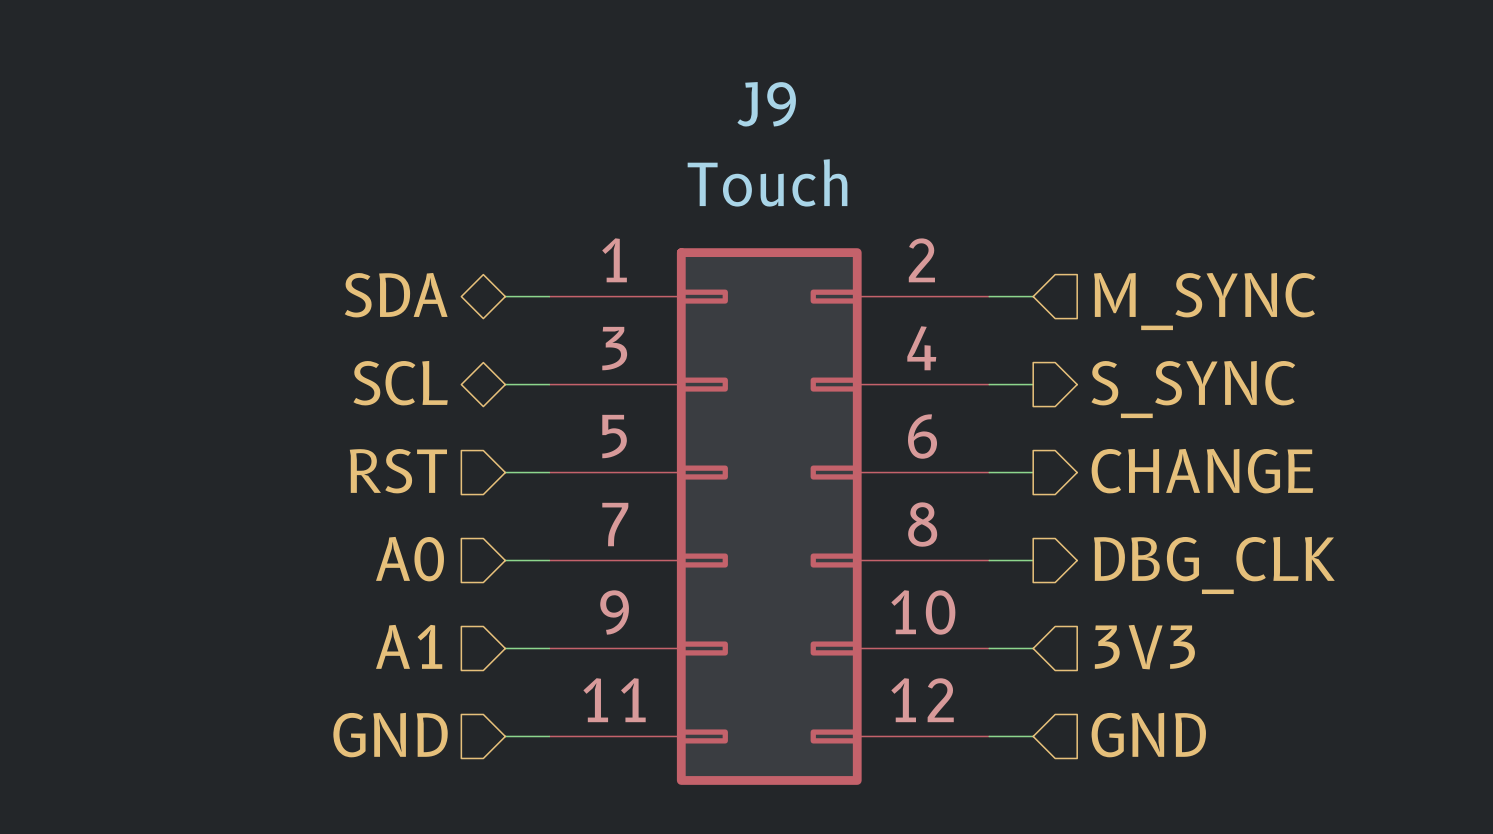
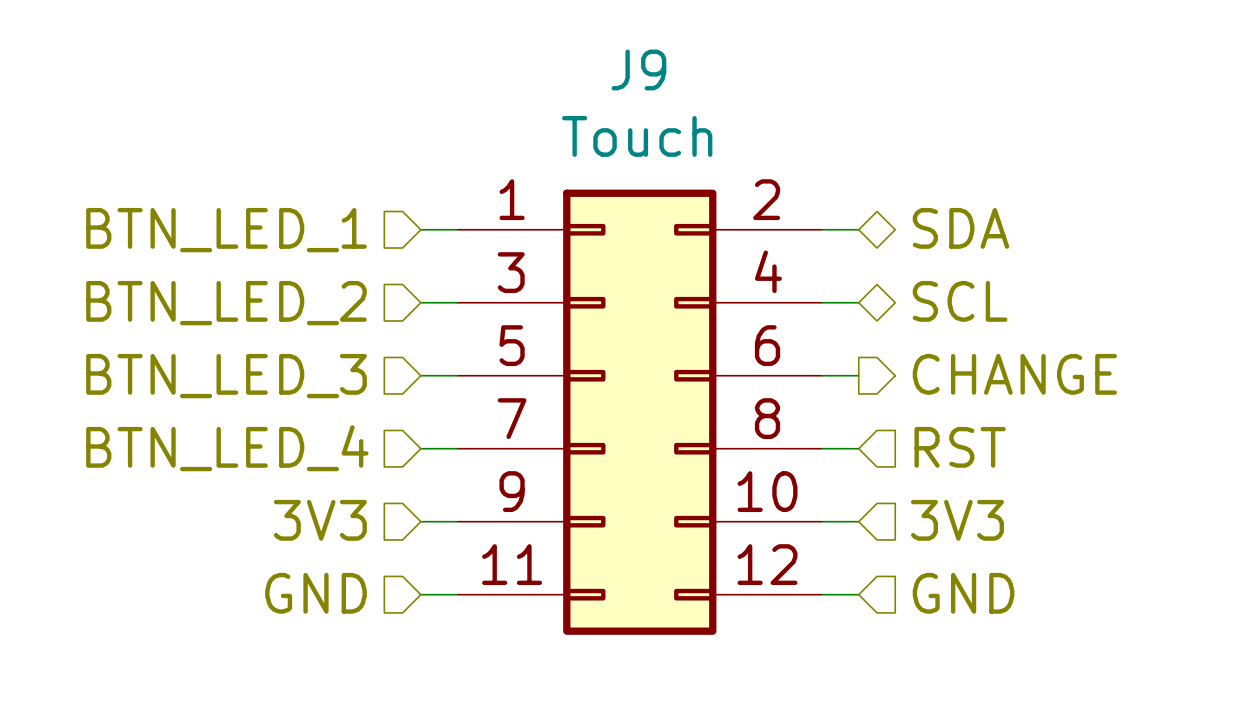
hierarchical label shape: bidirectional (396, 295) -> input (226, 230)
hierarchical label: SDA (396, 295) -> BTN_LED_1 (226, 230)
hierarchical label shape: input (1204, 301) -> bidirectional (960, 228)
hierarchical label: M_SYNC (1204, 301) -> SDA (960, 228)
hierarchical label shape: bidirectional (400, 383) -> input (226, 303)
hierarchical label: SCL (400, 383) -> BTN_LED_2 (226, 303)
hierarchical label shape: output (1193, 389) -> bidirectional (960, 301)
hierarchical label: S_SYNC (1193, 389) -> SCL (960, 301)
hierarchical label: RST (398, 471) -> BTN_LED_3 (226, 376)
hierarchical label: A0 (410, 559) -> BTN_LED_4 (227, 448)
hierarchical label shape: output (1214, 565) -> input (960, 447)
hierarchical label: DBG_CLK (1214, 565) -> RST (960, 447)
hierarchical label: A1 (409, 646) -> 3V3 (320, 520)

